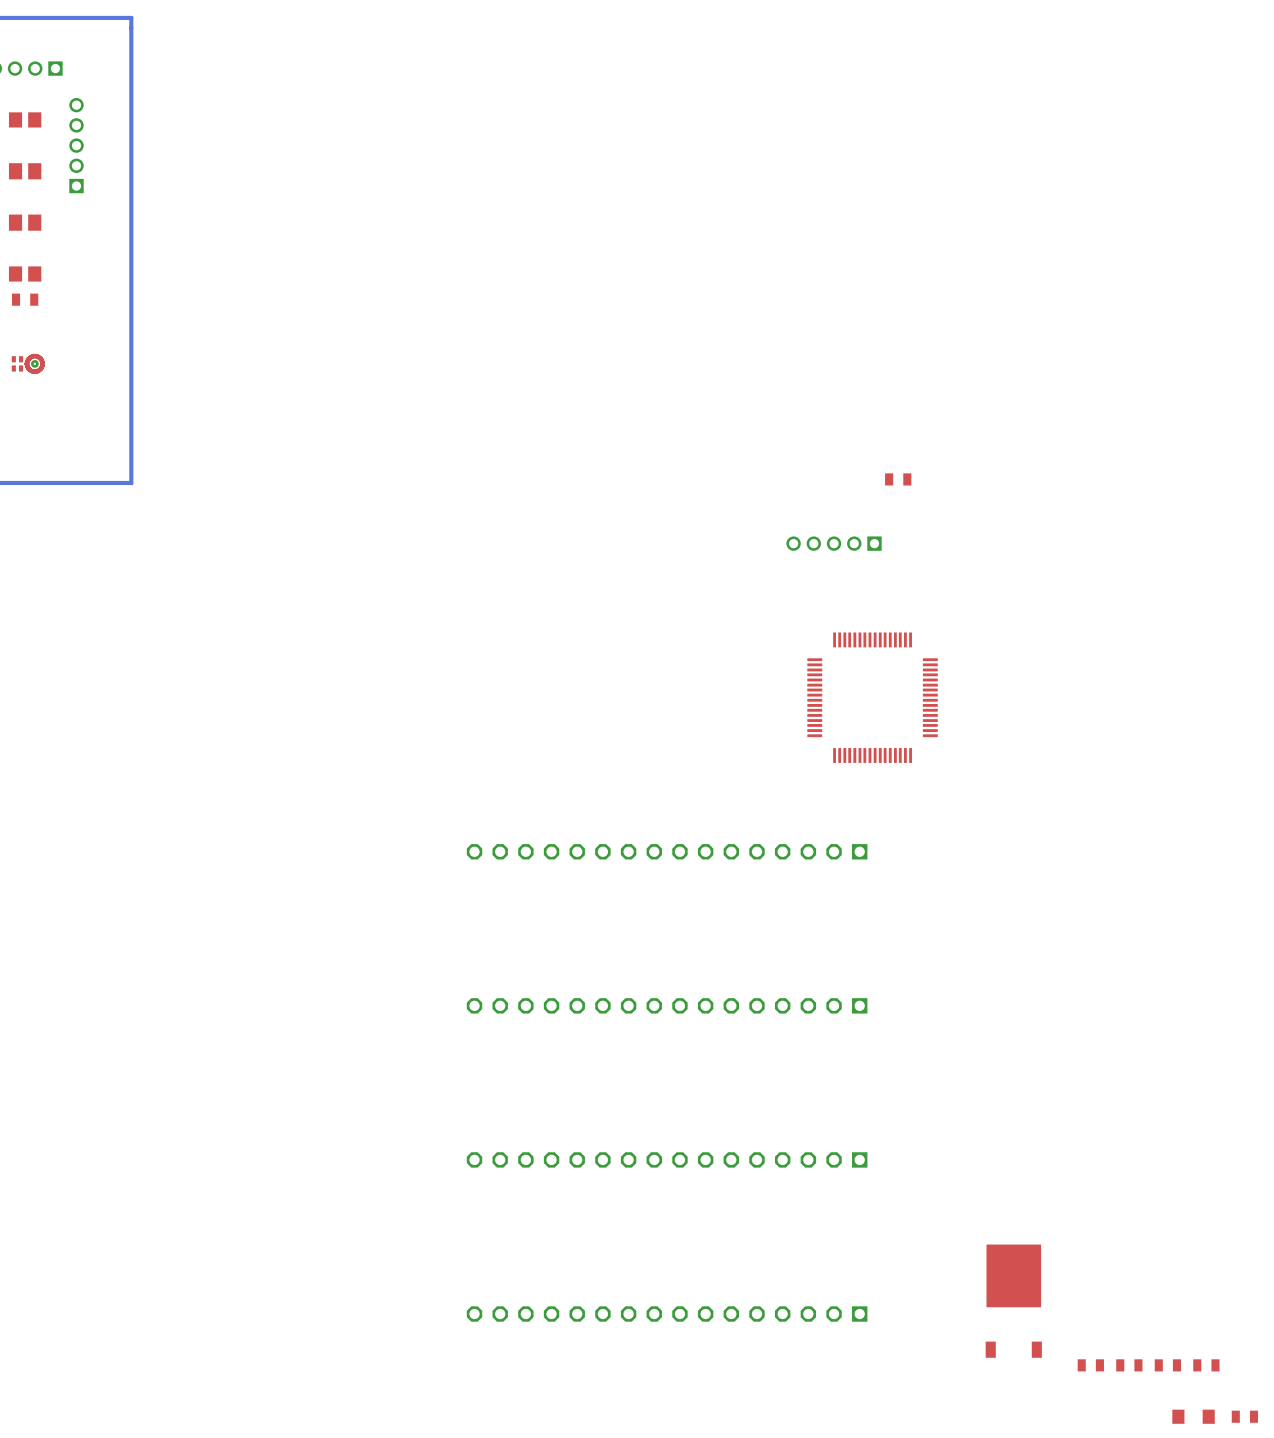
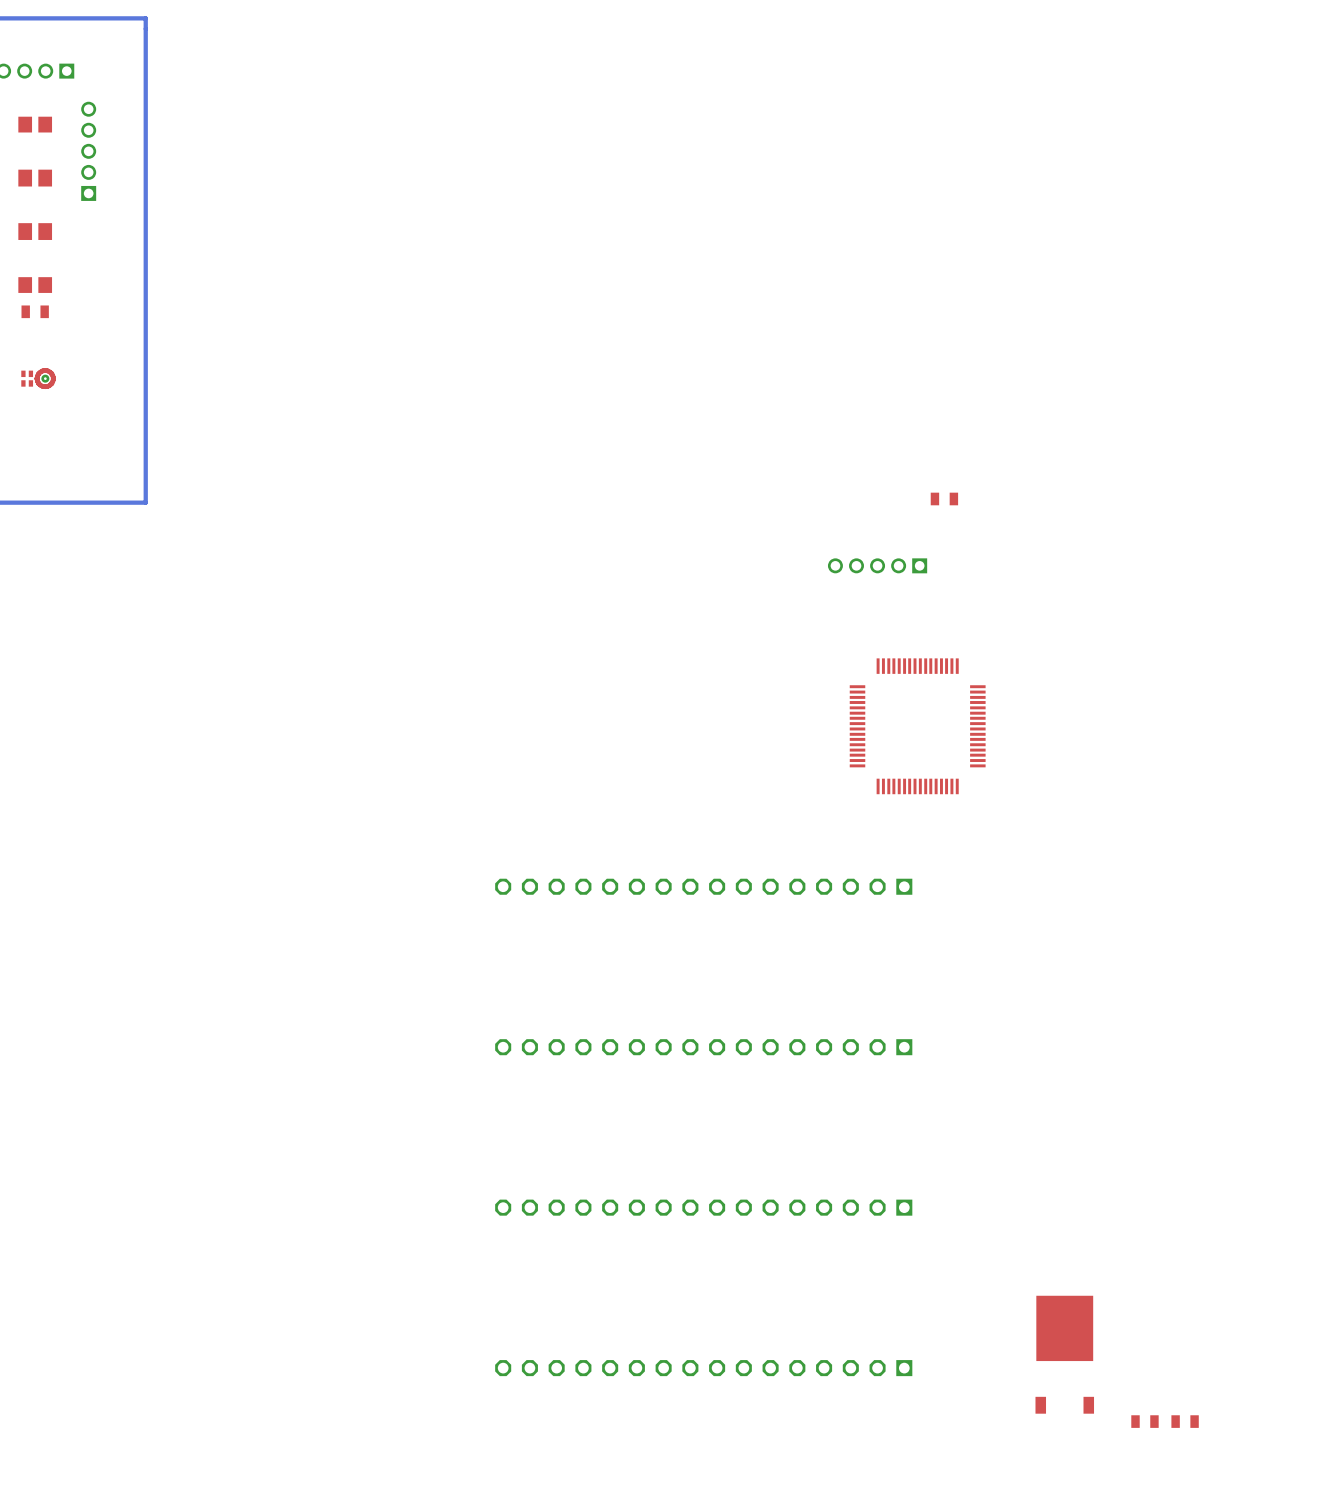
part: (1167, 1365) -> none
part: (1206, 1365) -> none
part: (1193, 1416) -> none
part: (1244, 1416) -> none

